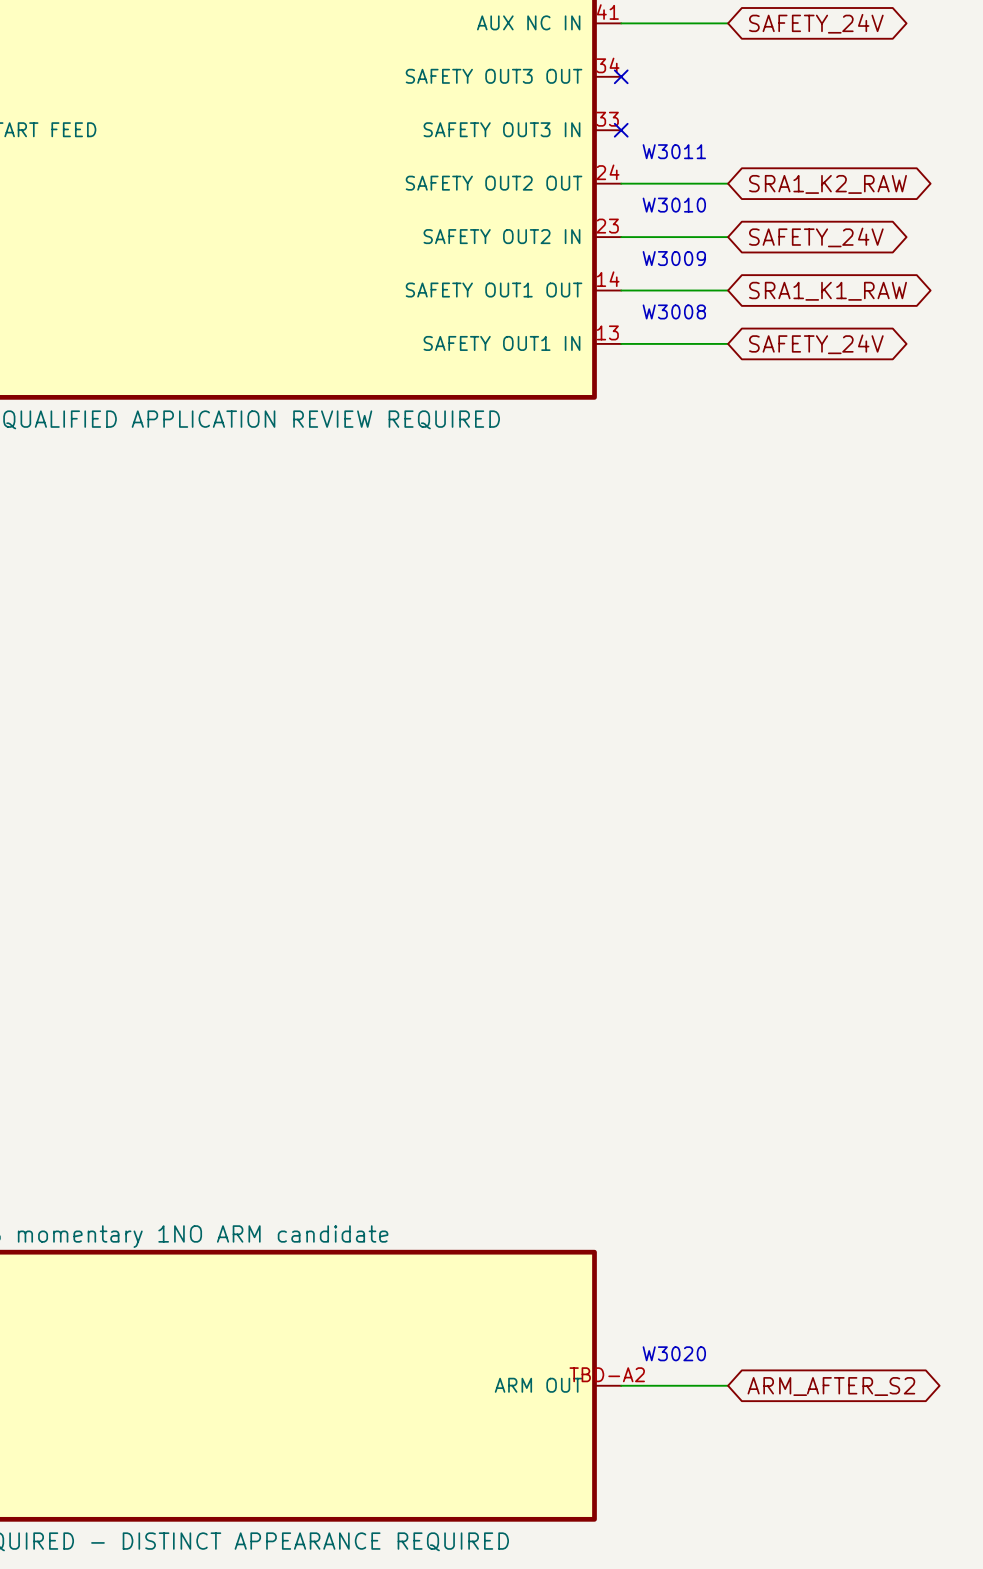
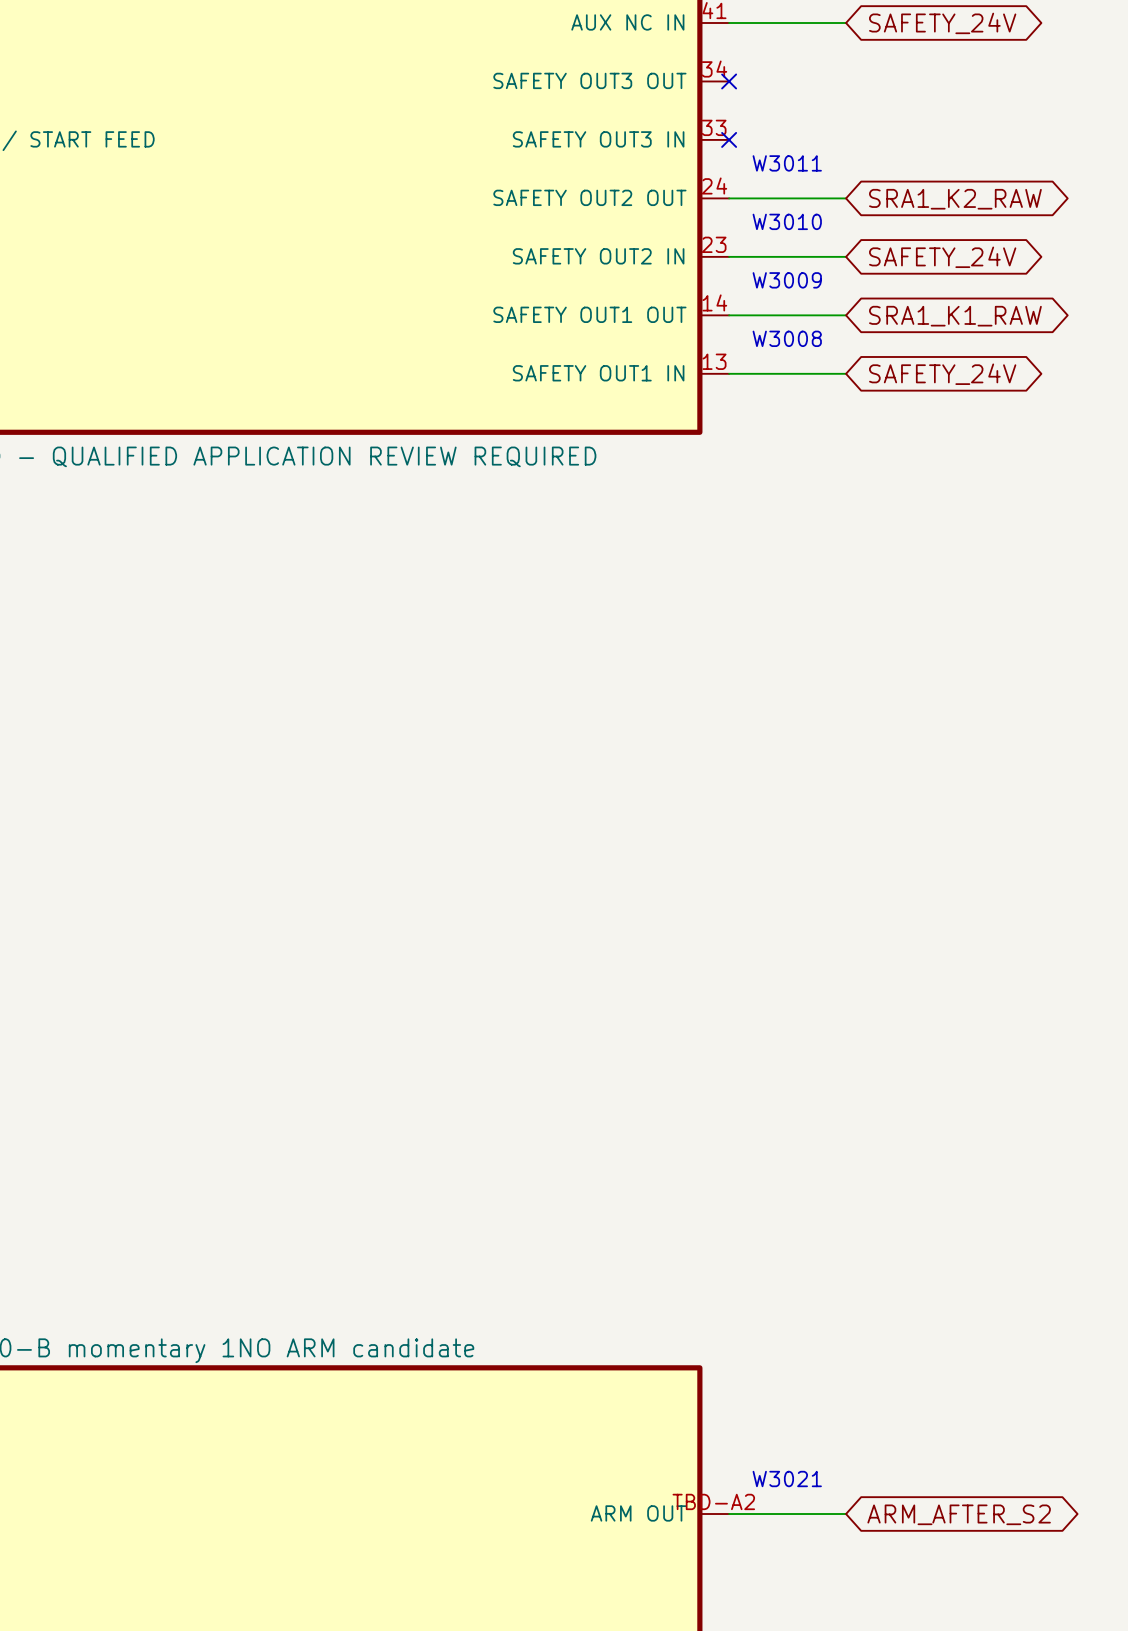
text: W3020 (674, 1353) -> W3021 (787, 1479)

